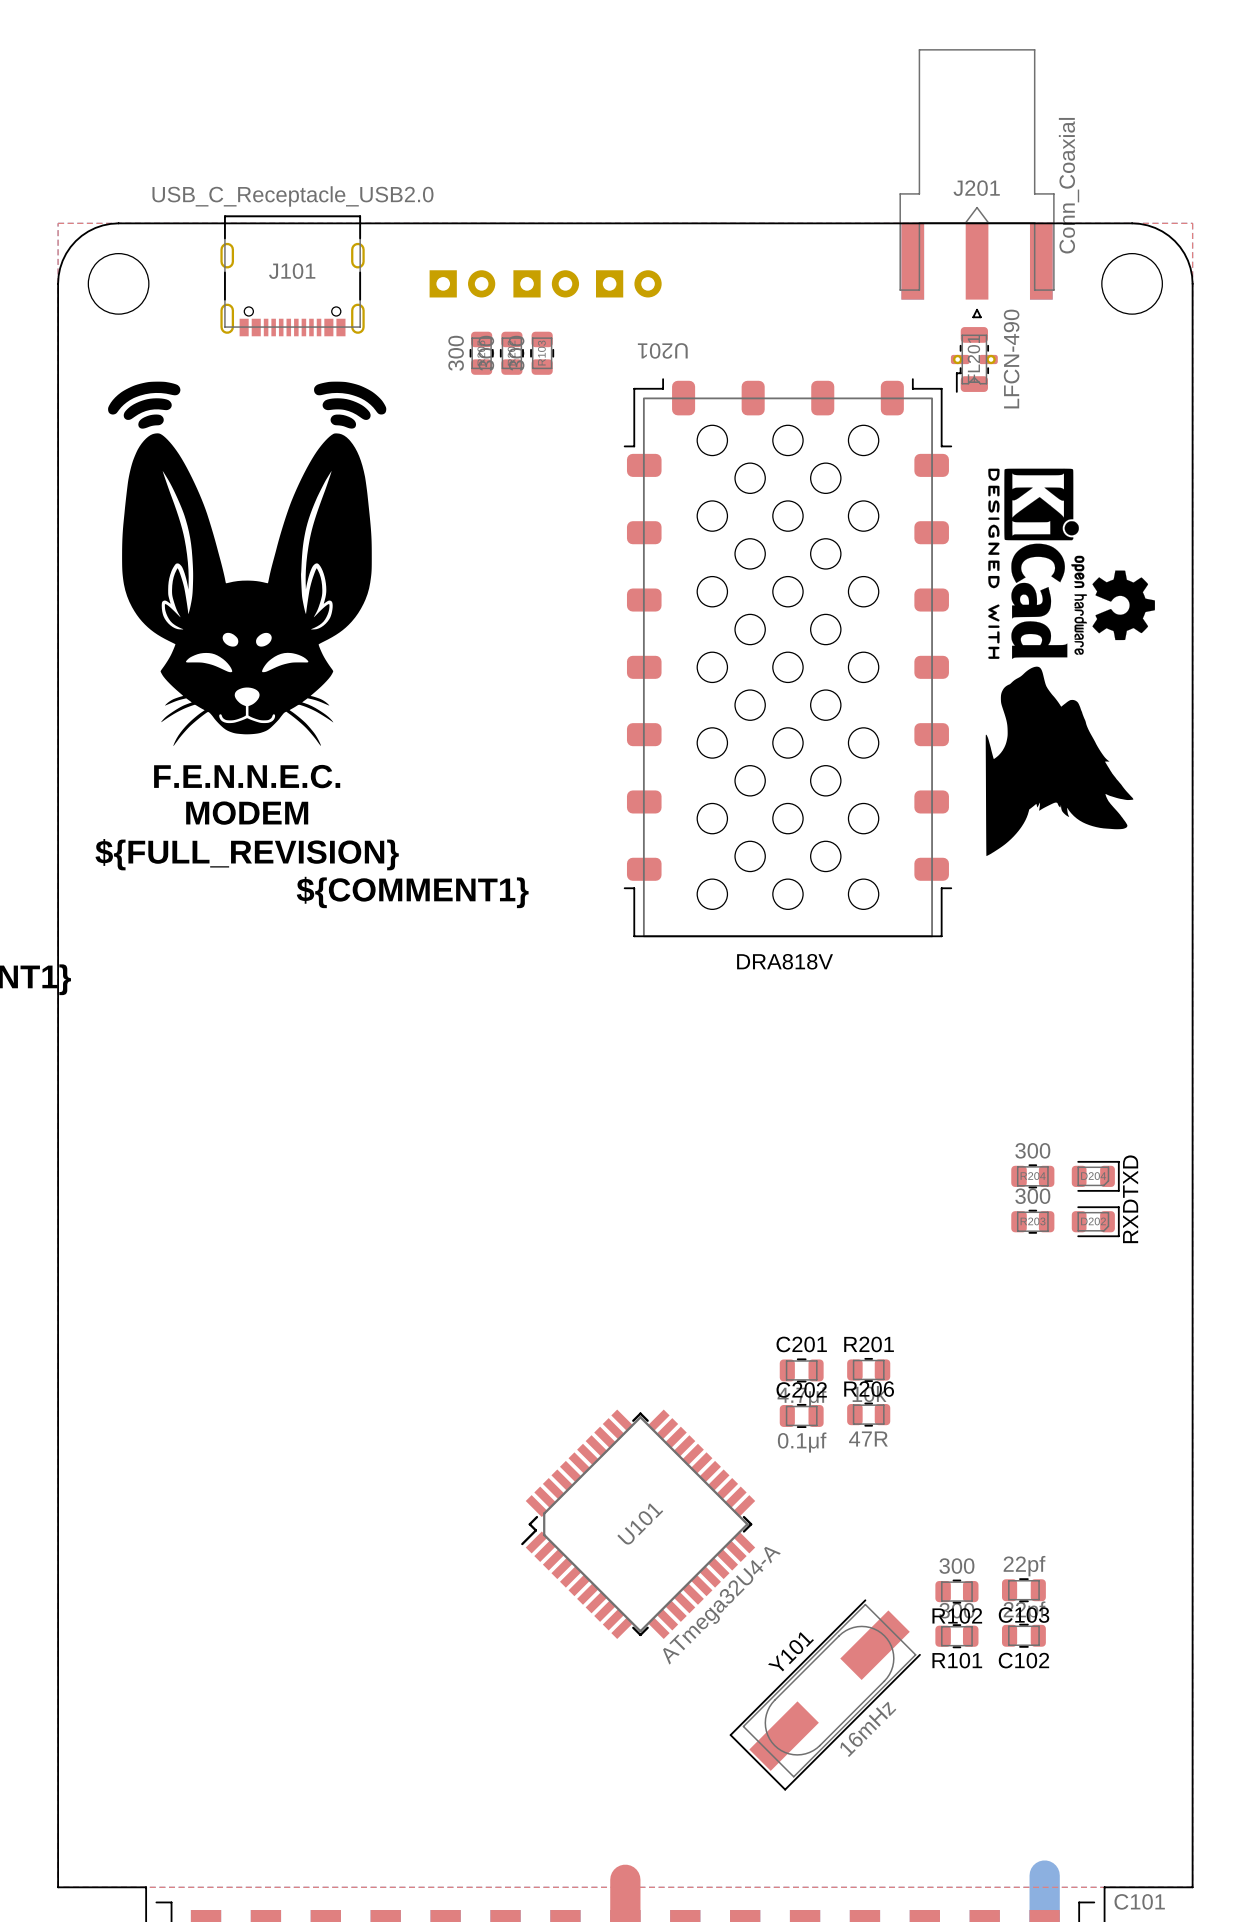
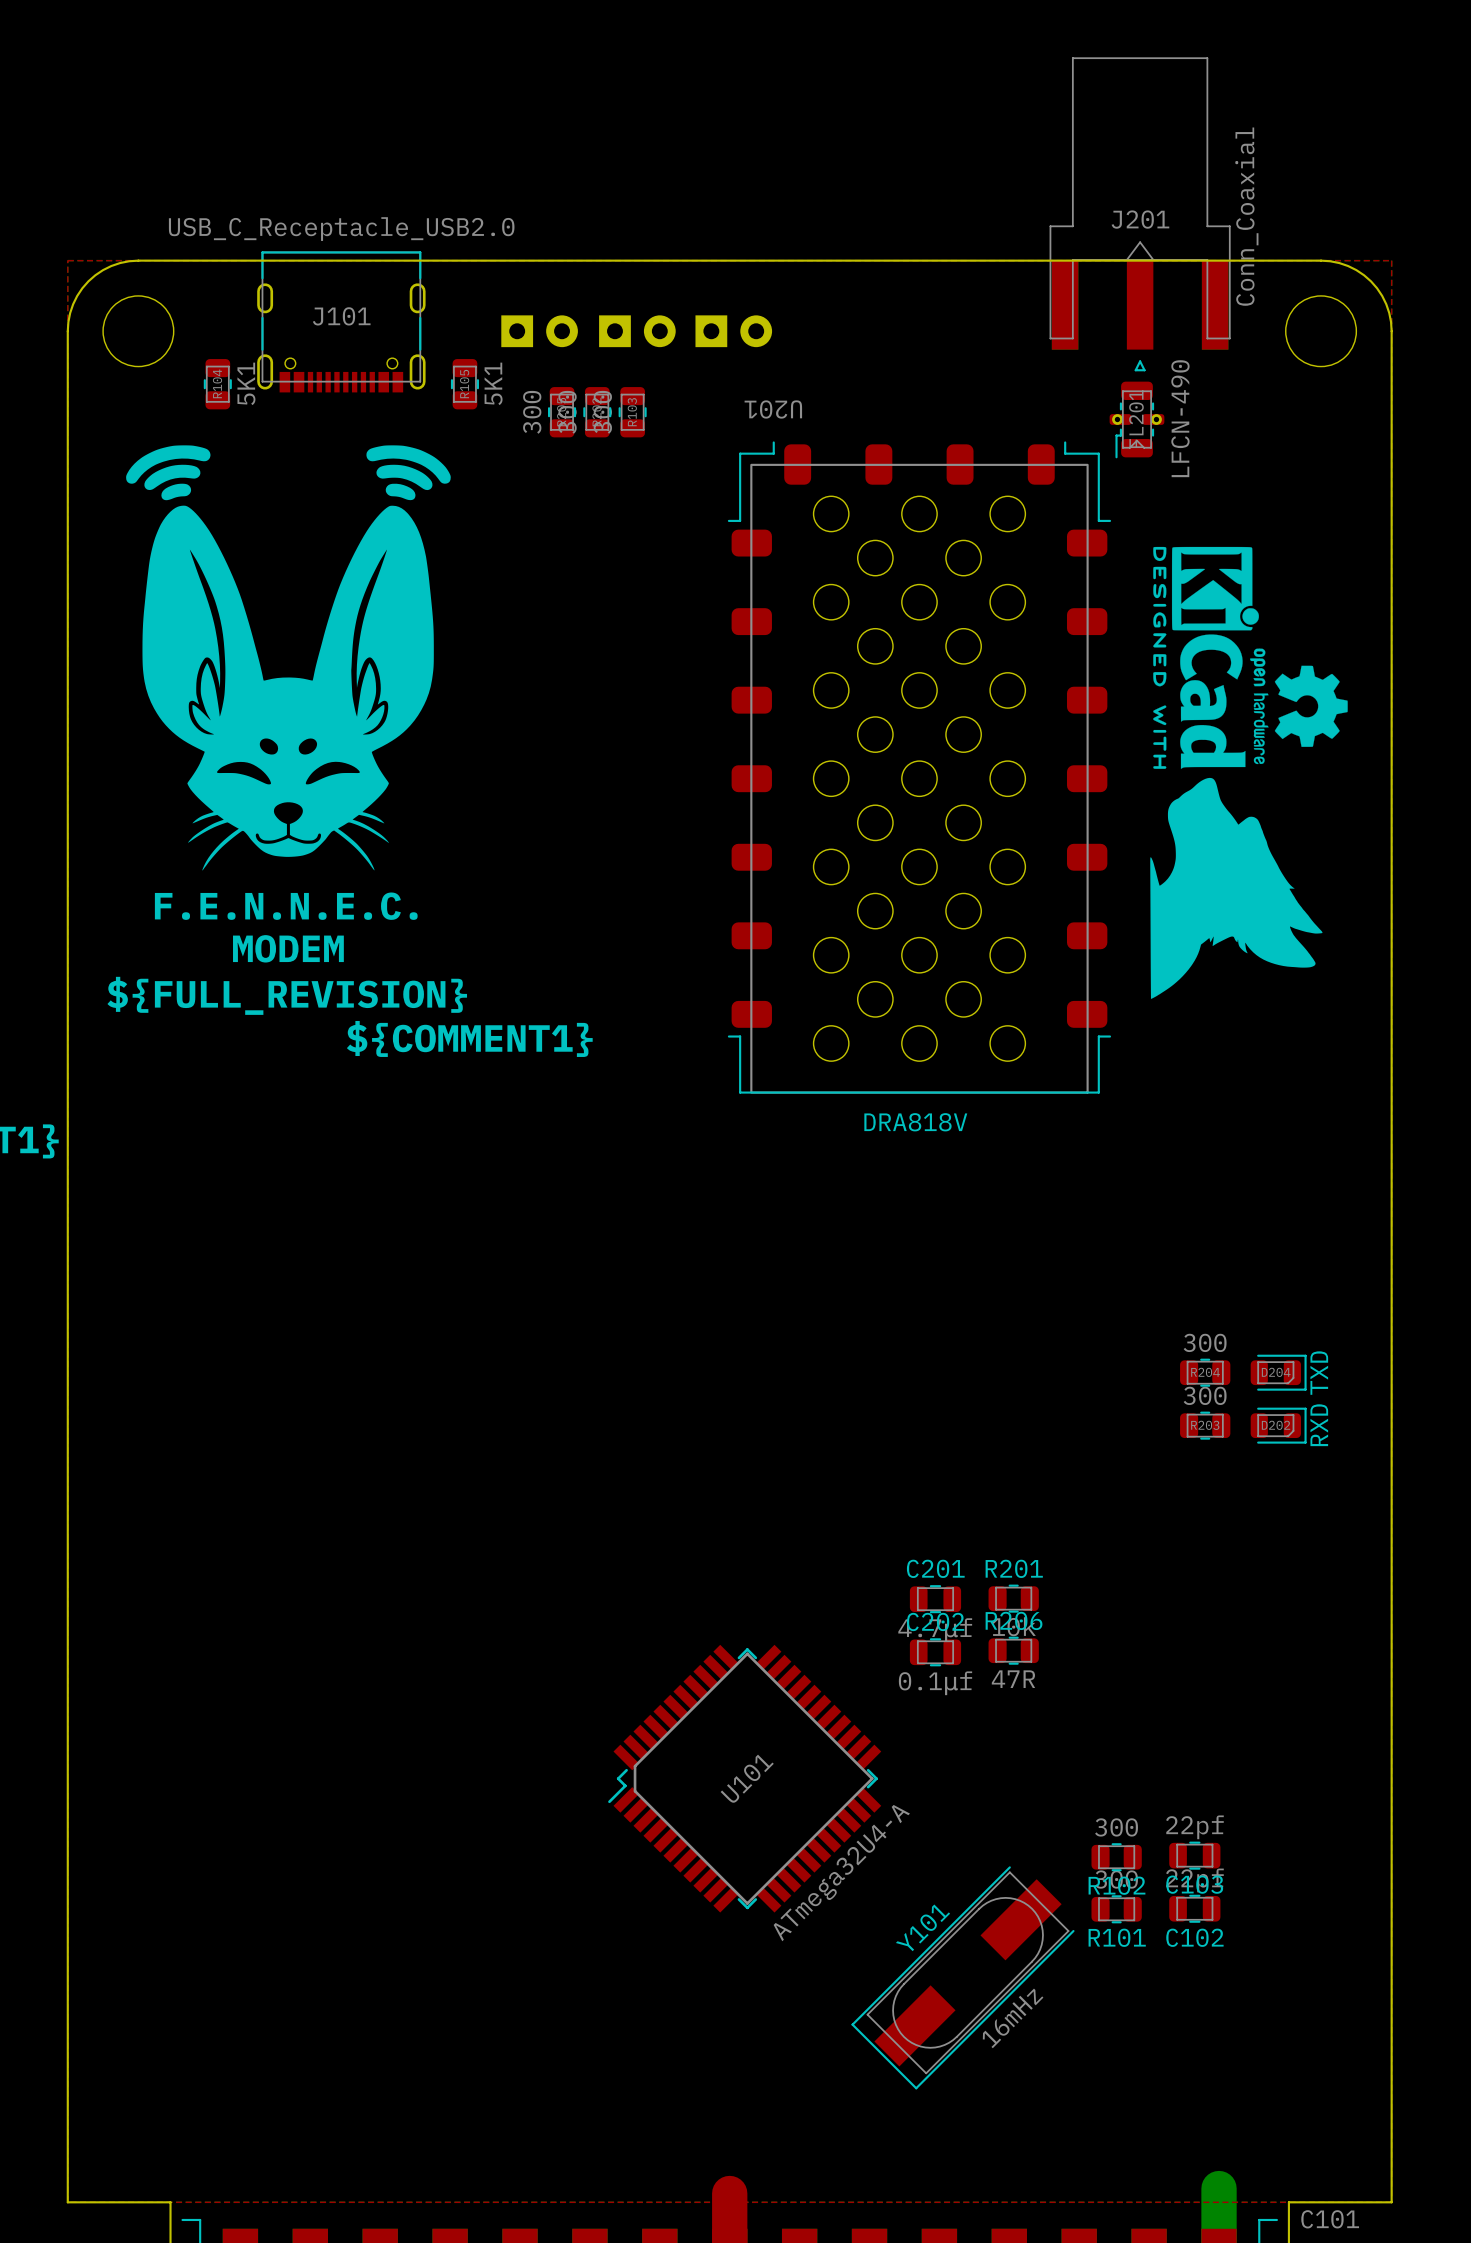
R104: none -> 5K1 (217, 384)
R105: none -> 5K1 (464, 384)

